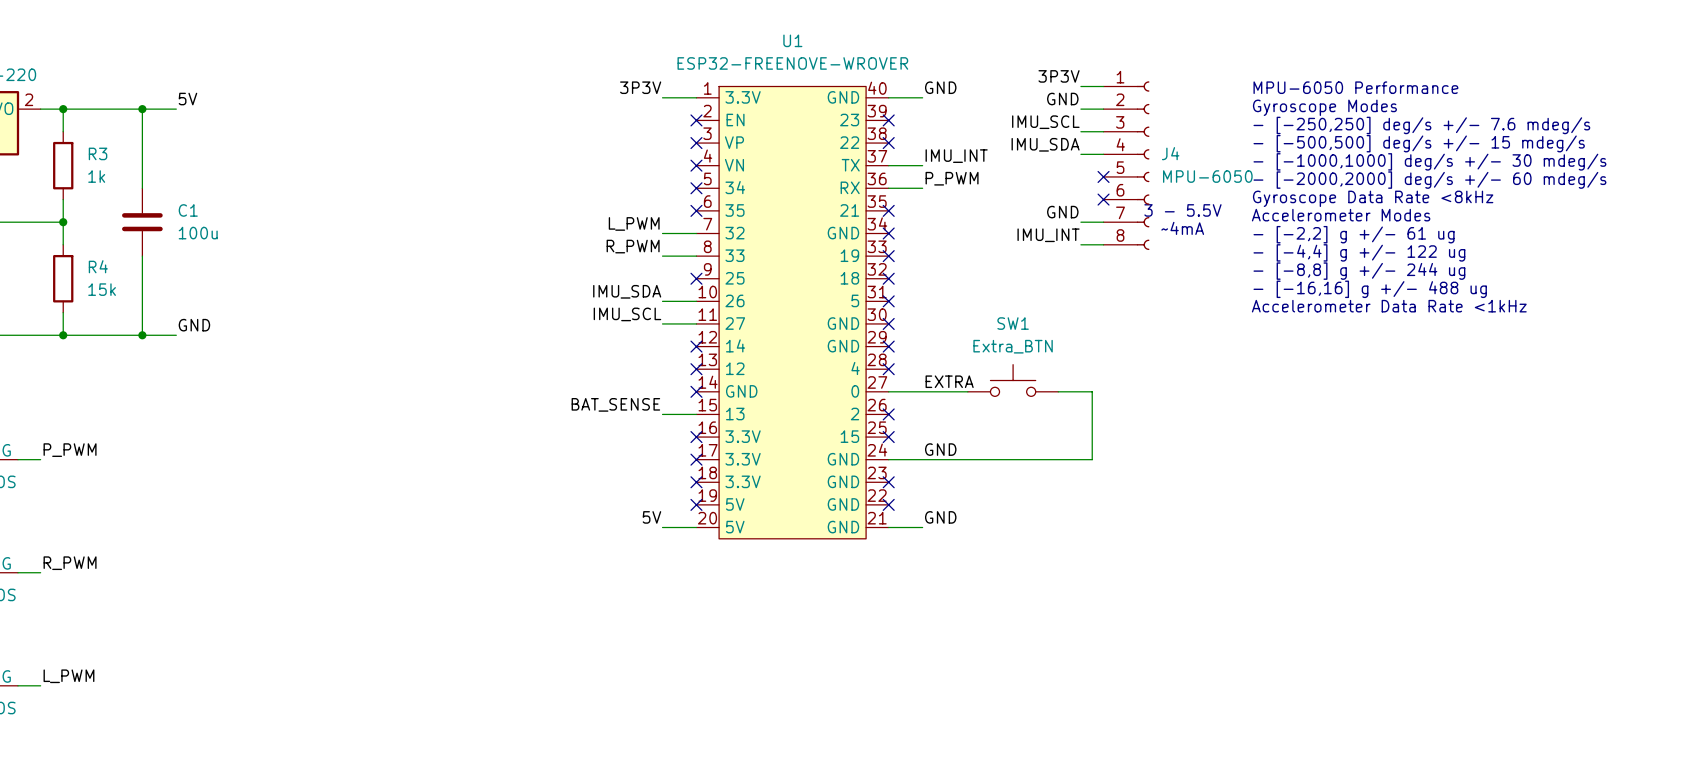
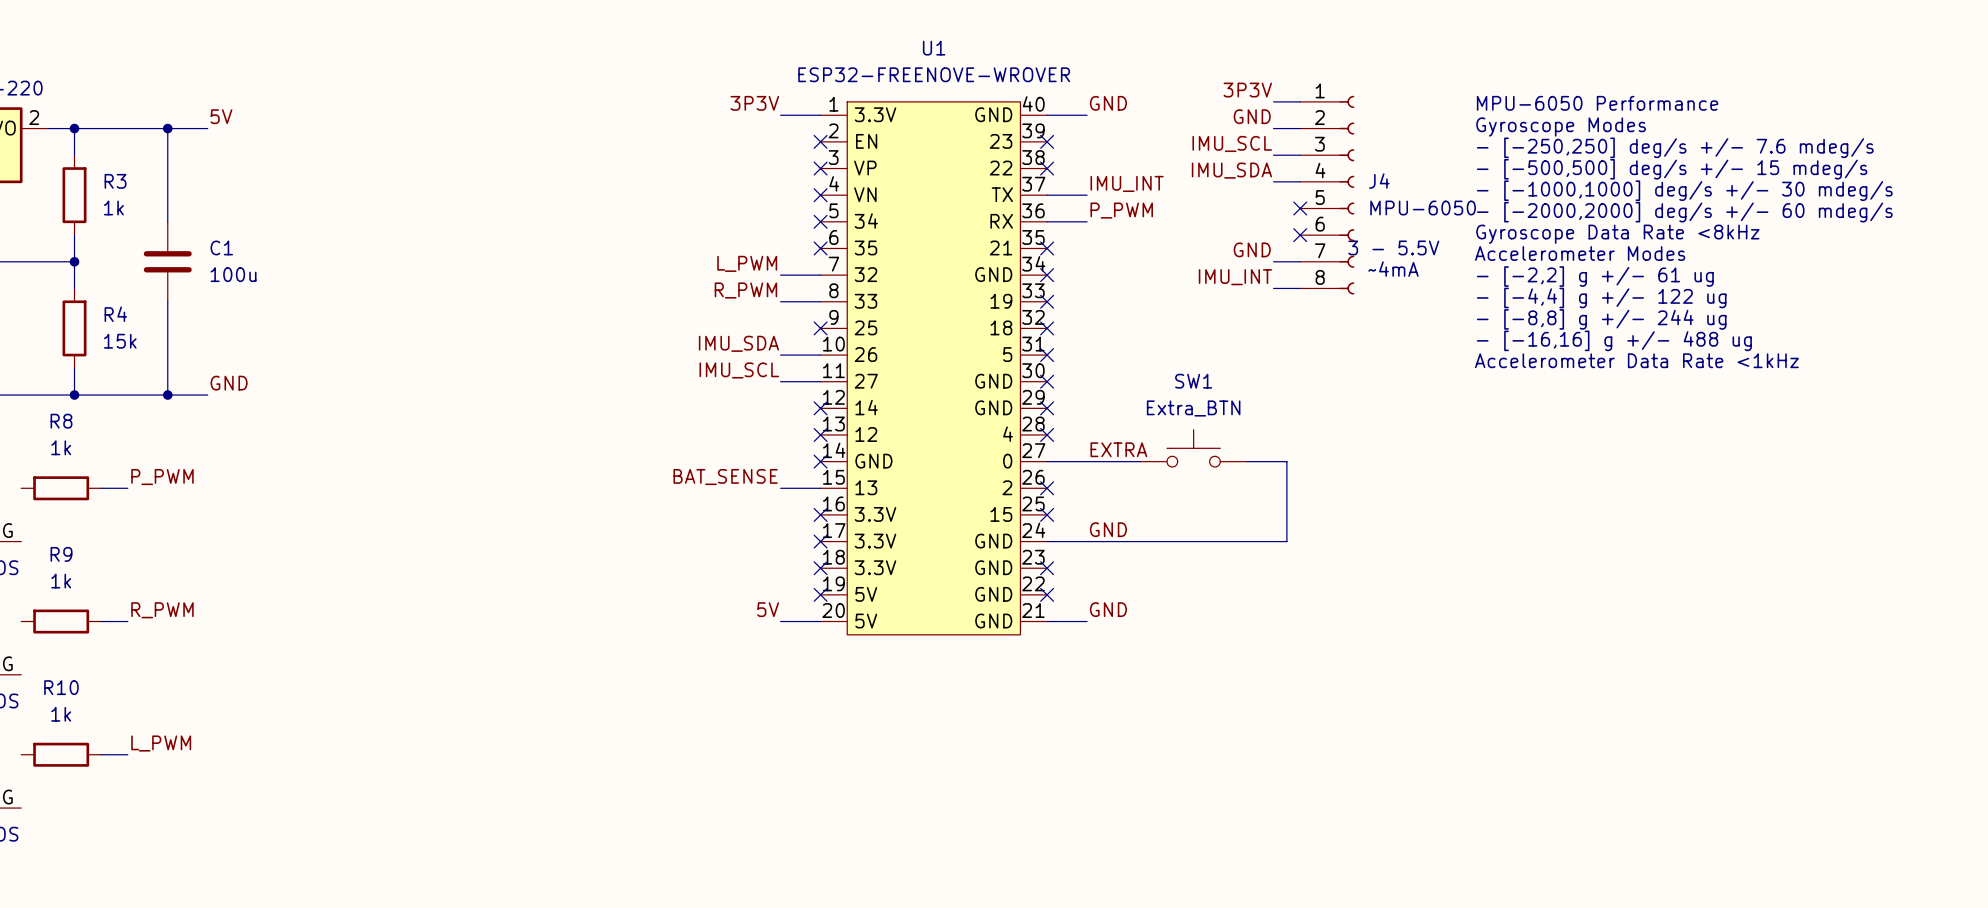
R8: none -> 1k (61, 488)
label position: P_PWM (70, 450) -> P_PWM (162, 477)
wire: (17, 459) (40, 459) -> (101, 488) (127, 488)
R9: none -> 1k (61, 621)
label position: R_PWM (70, 563) -> R_PWM (162, 610)
wire: (17, 572) (40, 572) -> (101, 621) (127, 621)
R10: none -> 1k (61, 754)
label position: L_PWM (68, 676) -> L_PWM (161, 743)
wire: (17, 685) (40, 685) -> (101, 754) (127, 754)

